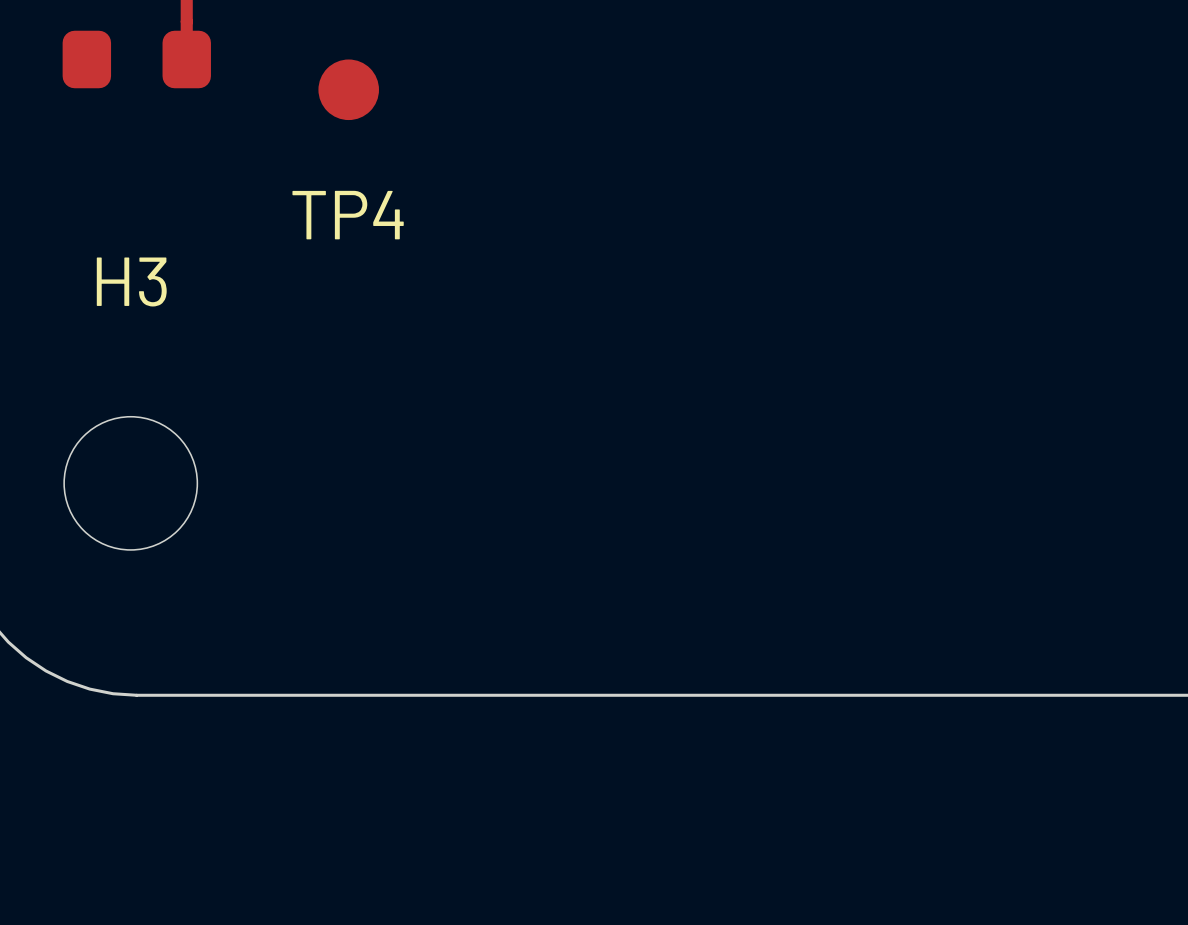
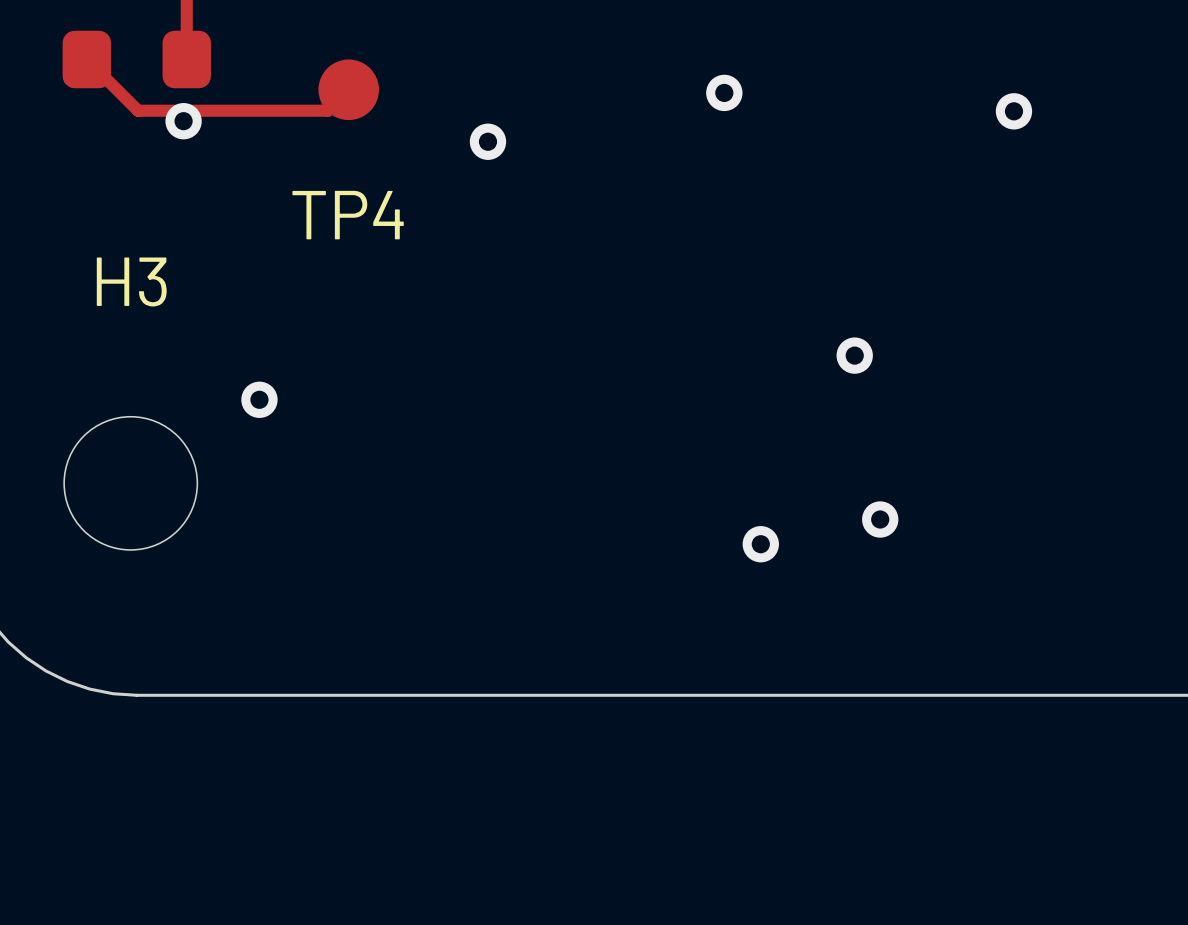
track: none -> (86, 59) (138, 110) (327, 110) (348, 89)
via: none -> (724, 92)
via: none -> (1013, 111)
via: none -> (183, 121)
via: none -> (487, 141)
via: none -> (854, 355)
via: none -> (259, 399)
via: none -> (880, 519)
via: none -> (760, 544)

